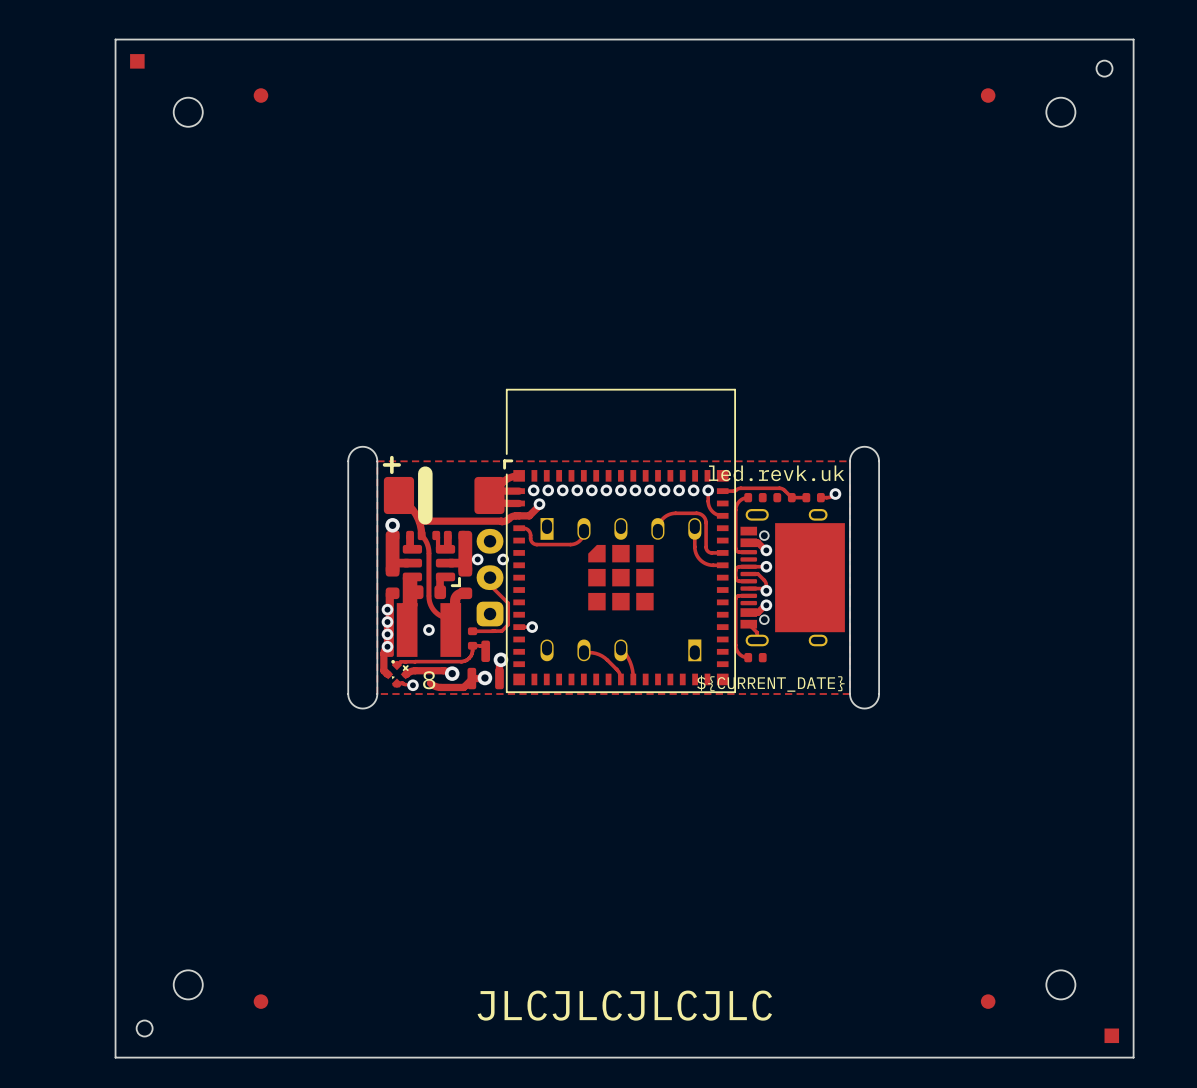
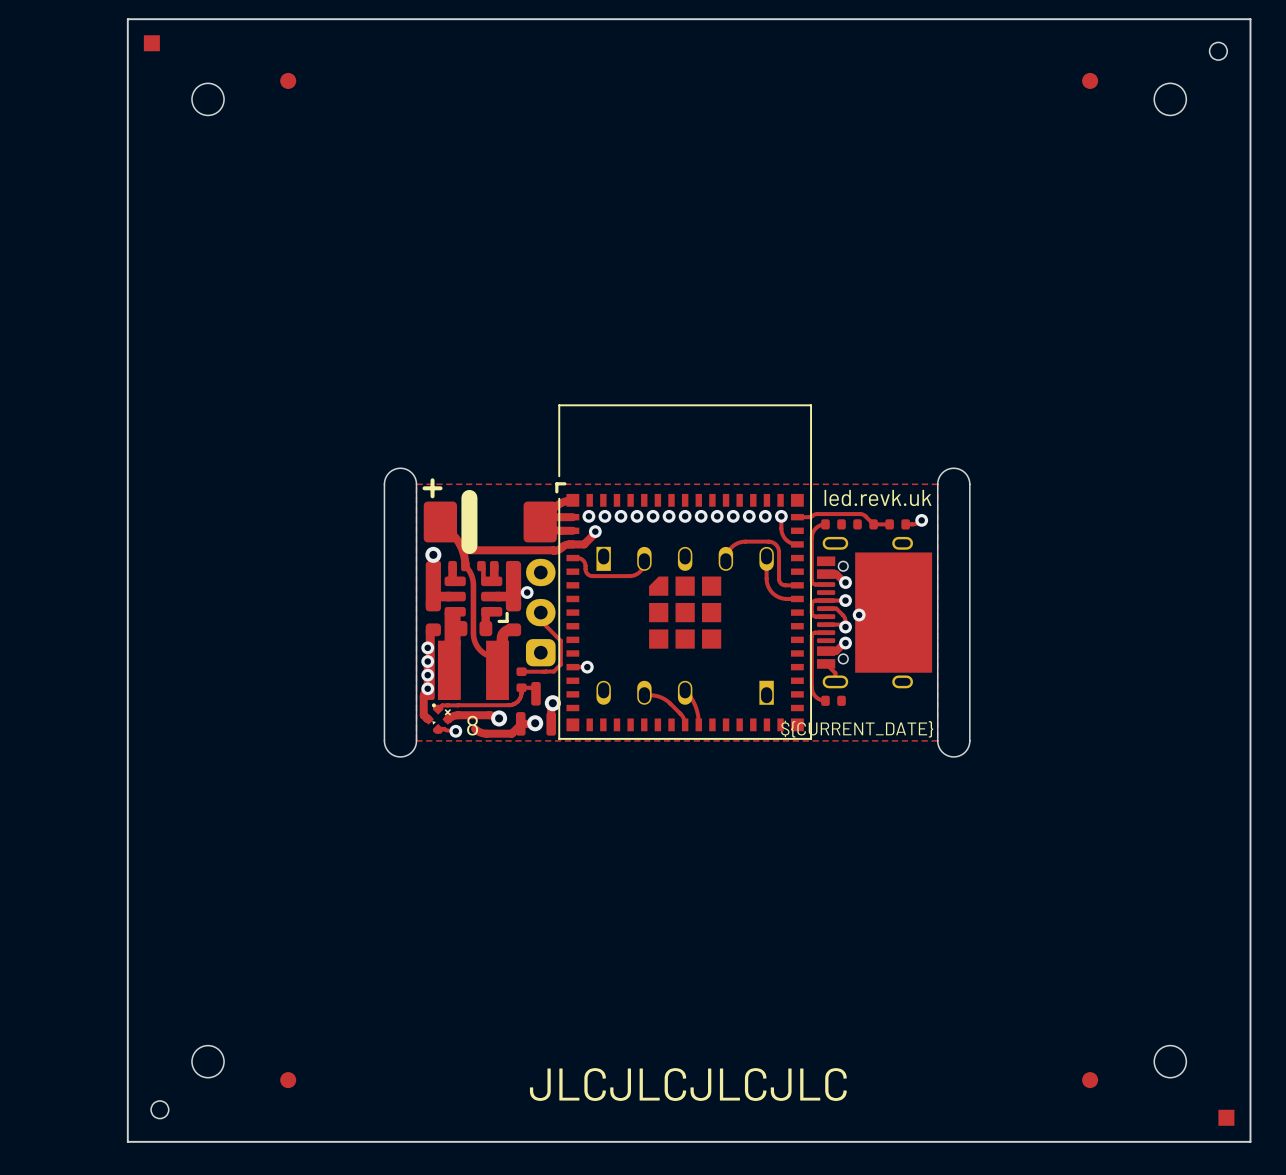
via: (503, 559) -> none
via: none -> (859, 615)
via: (428, 630) -> none

